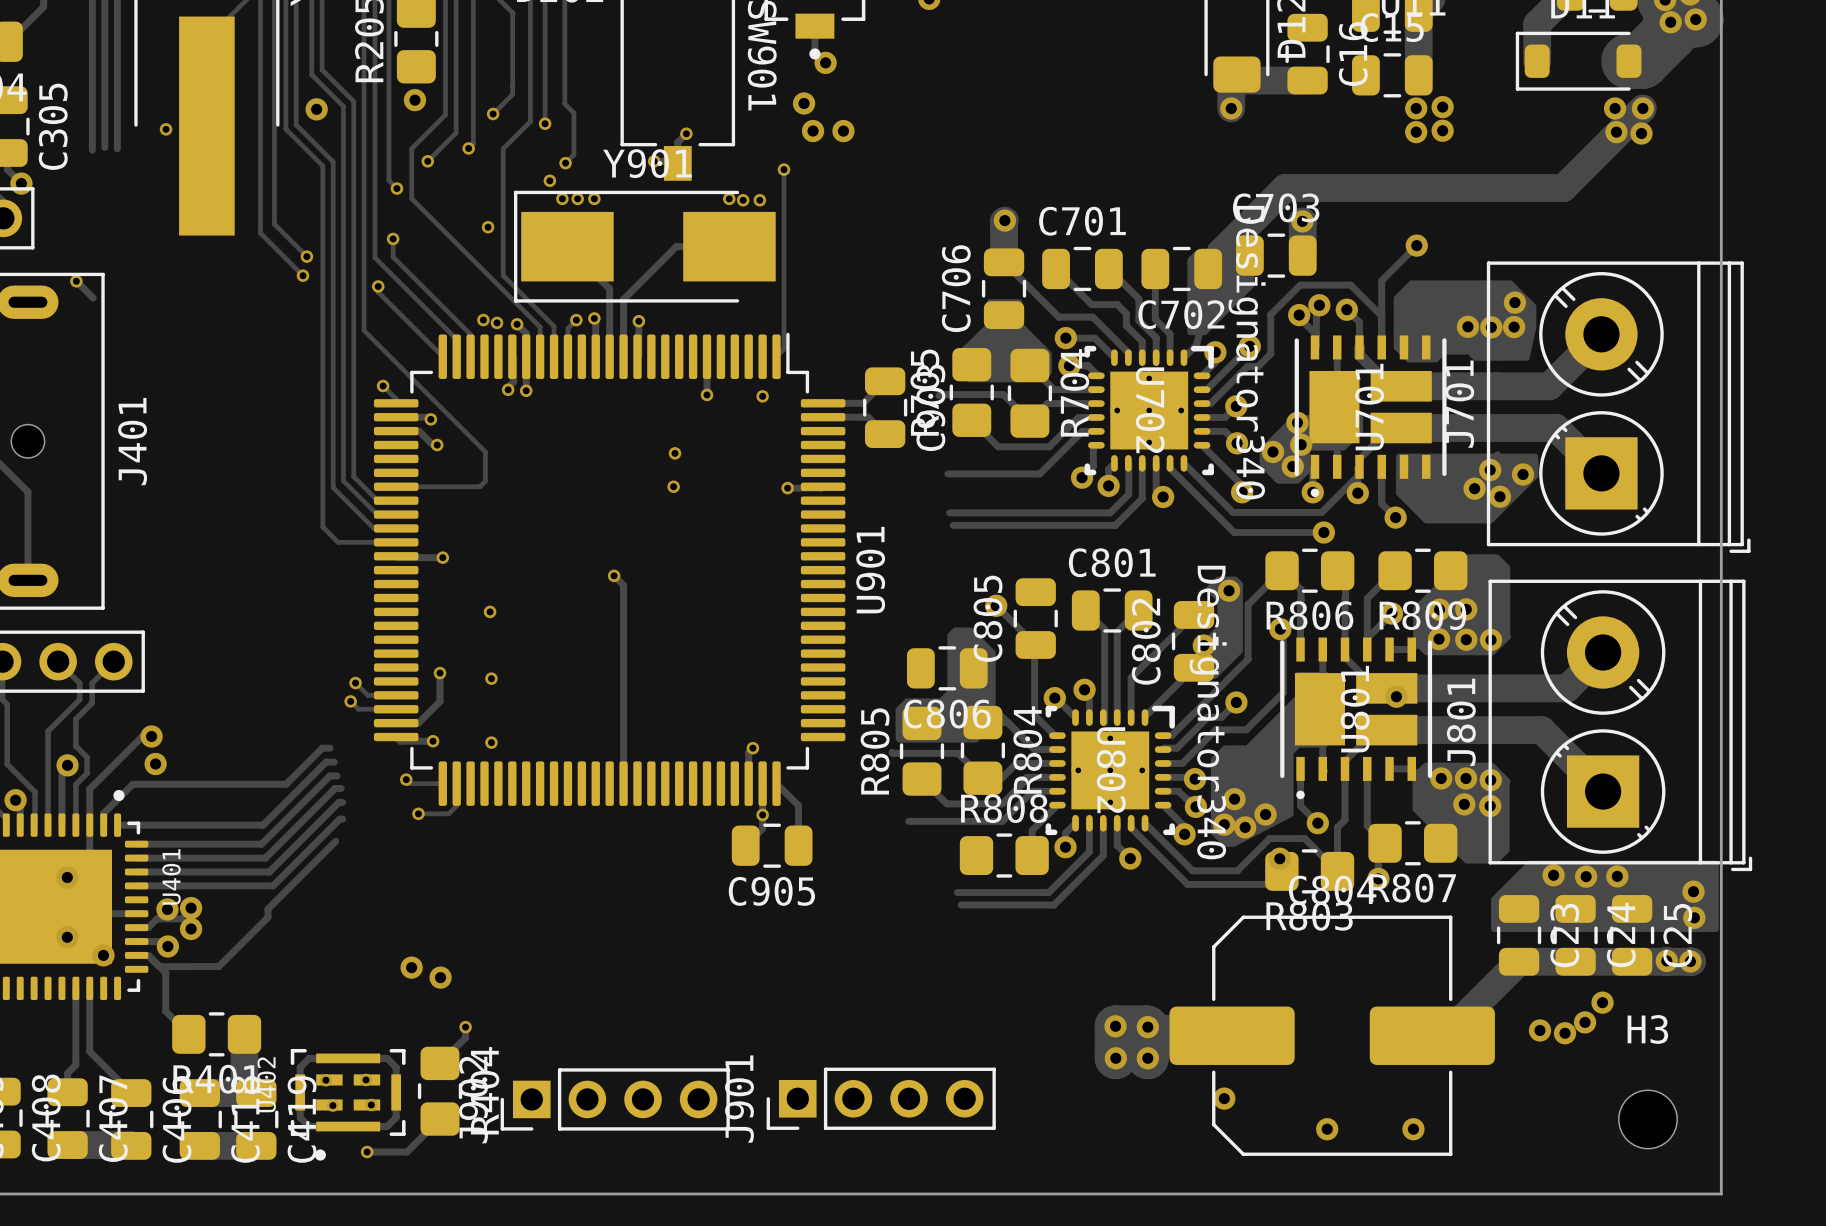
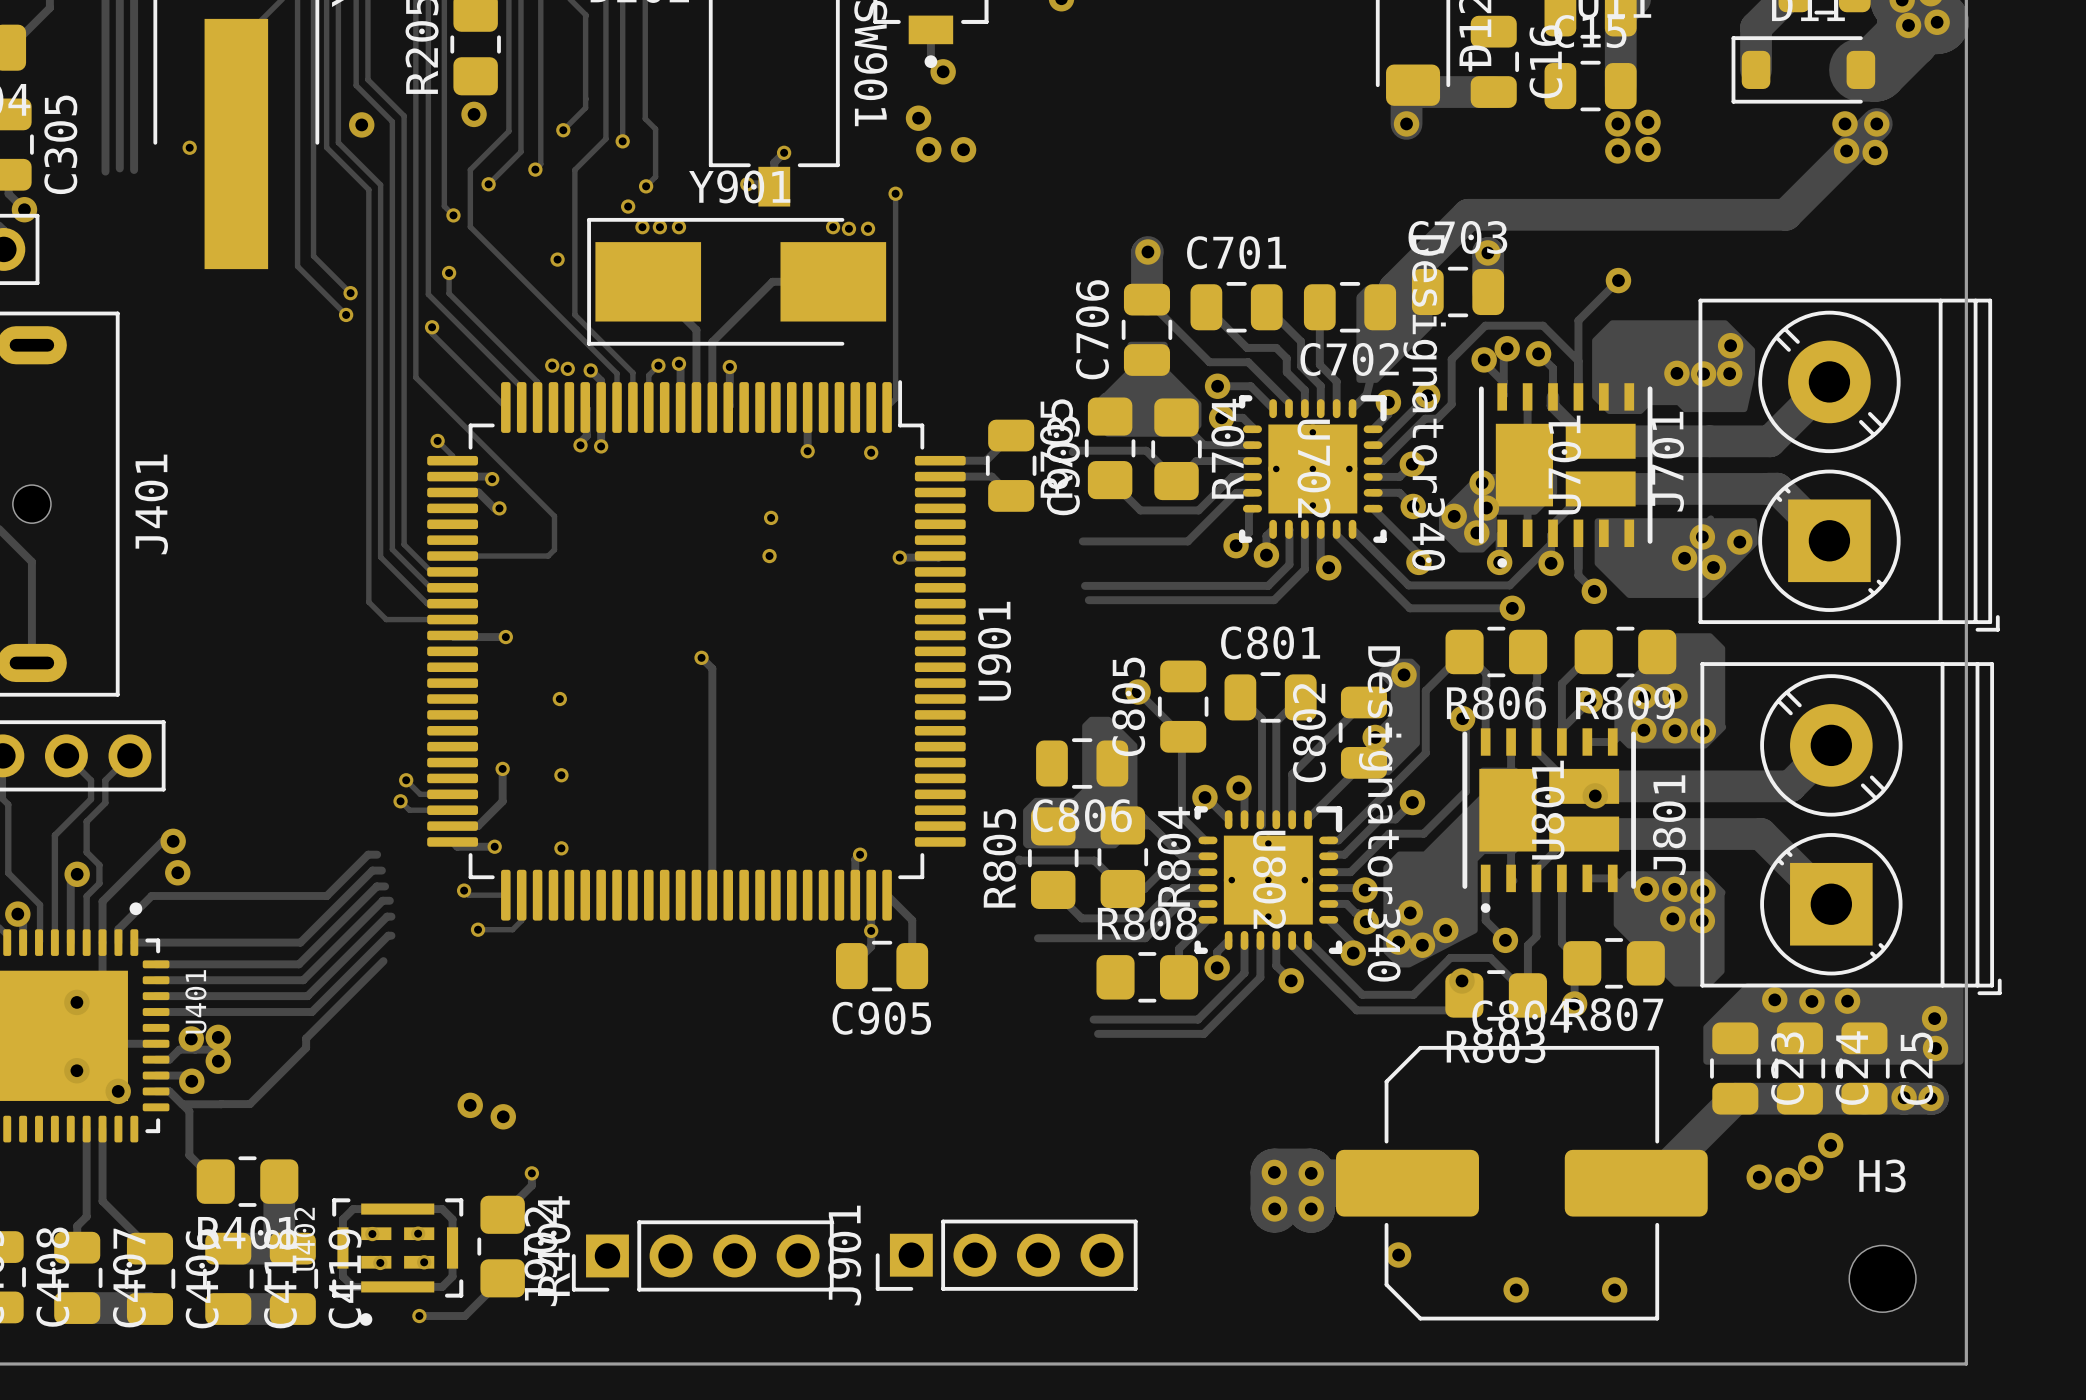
track: (76, 281) (93, 297) -> none
via: (76, 281) -> none

